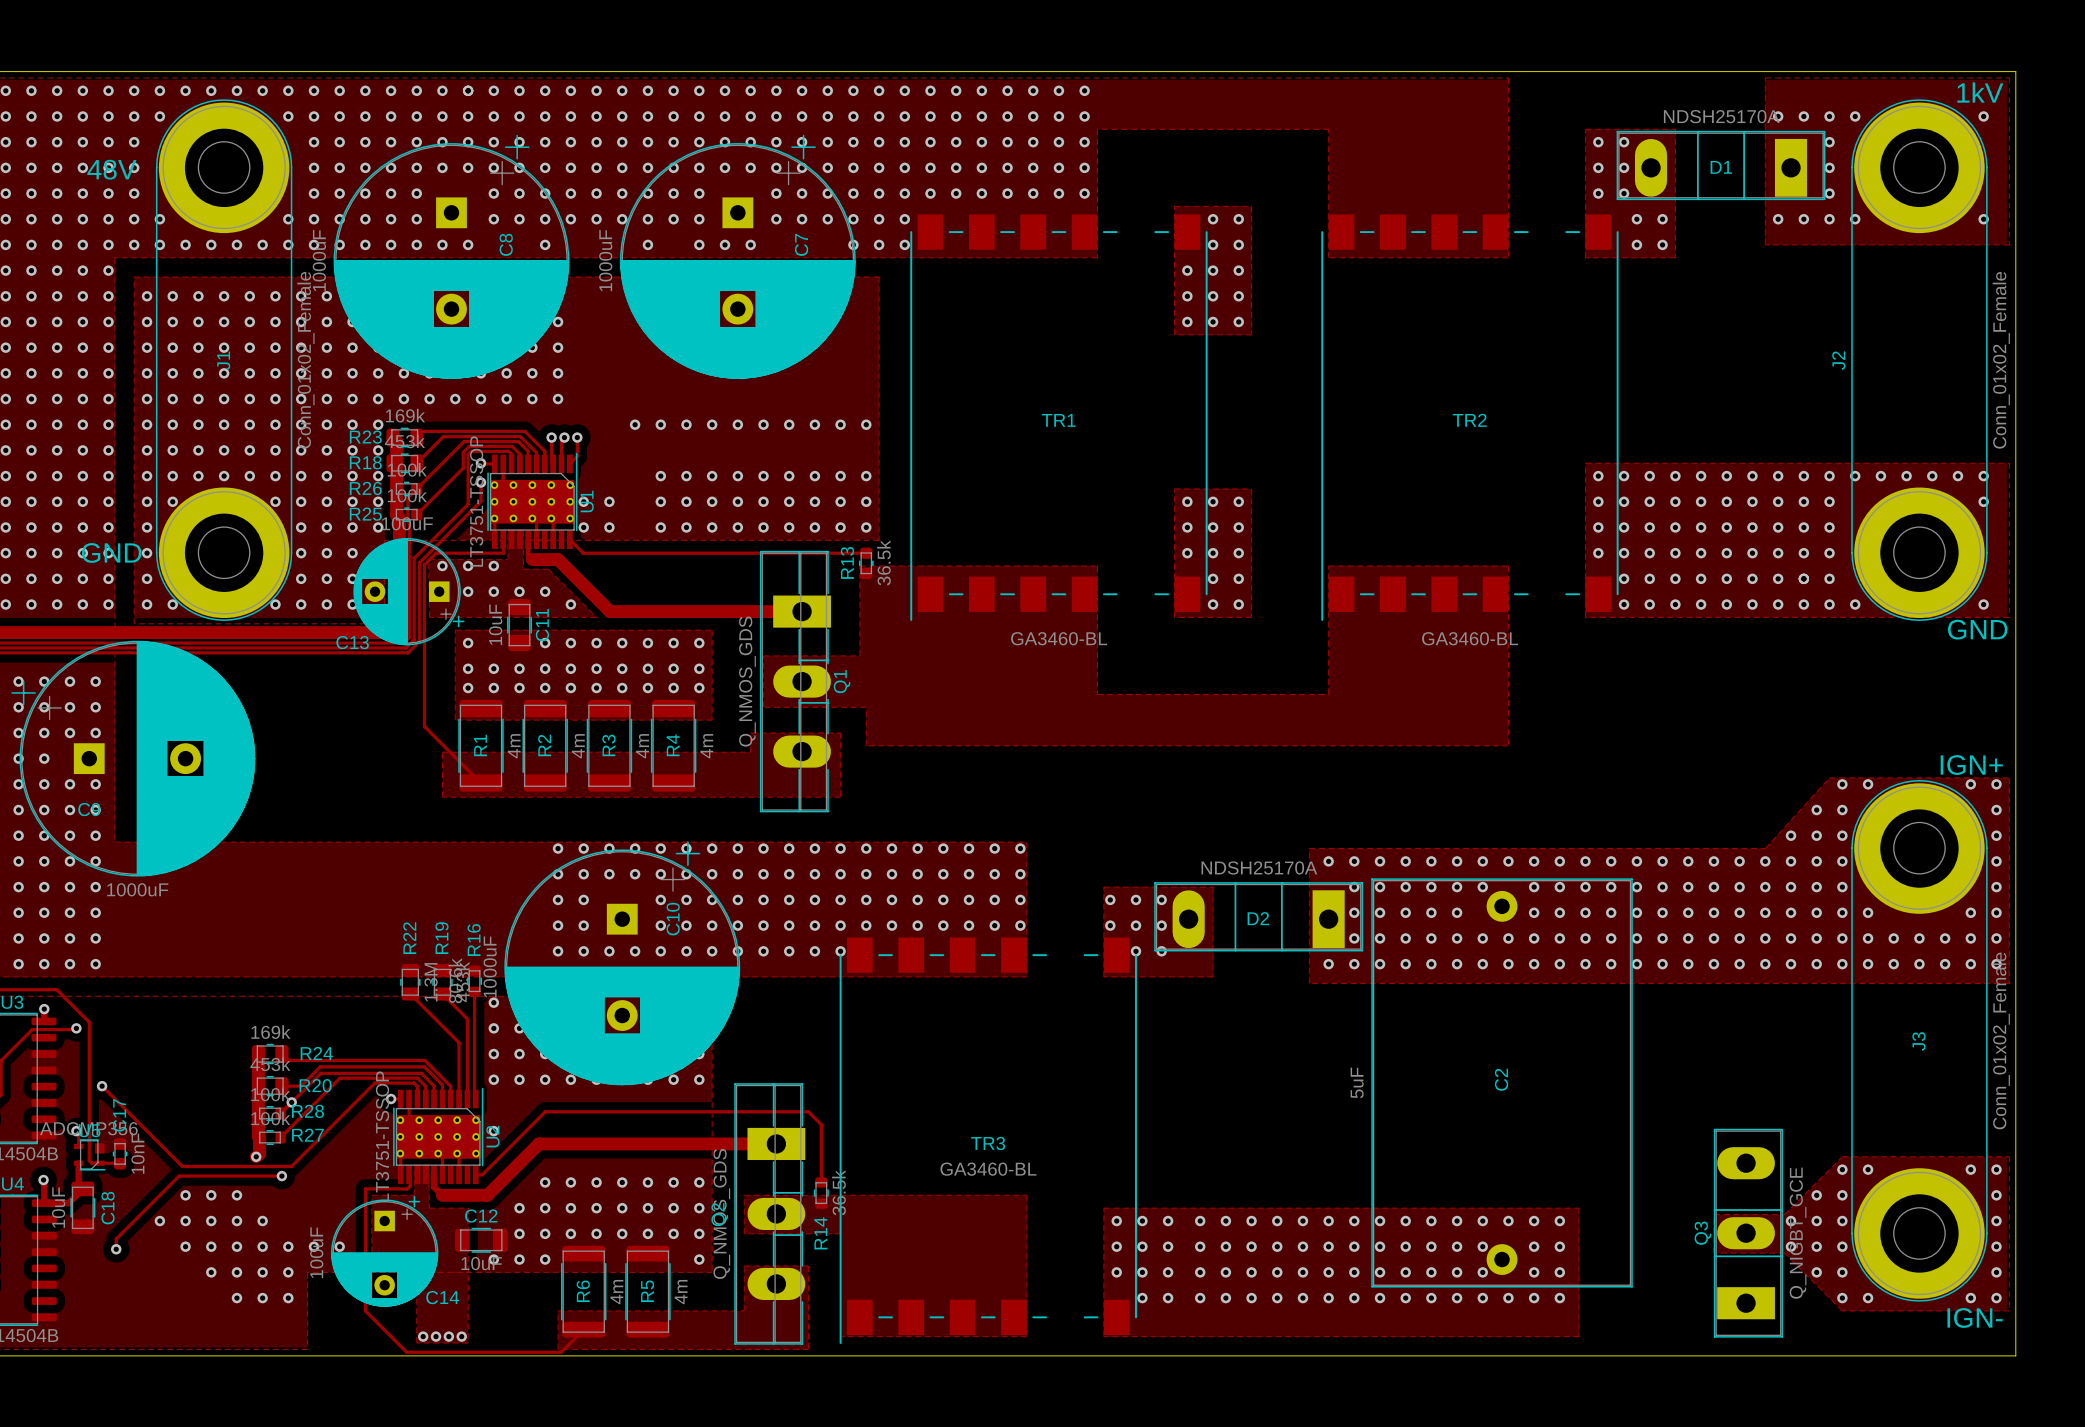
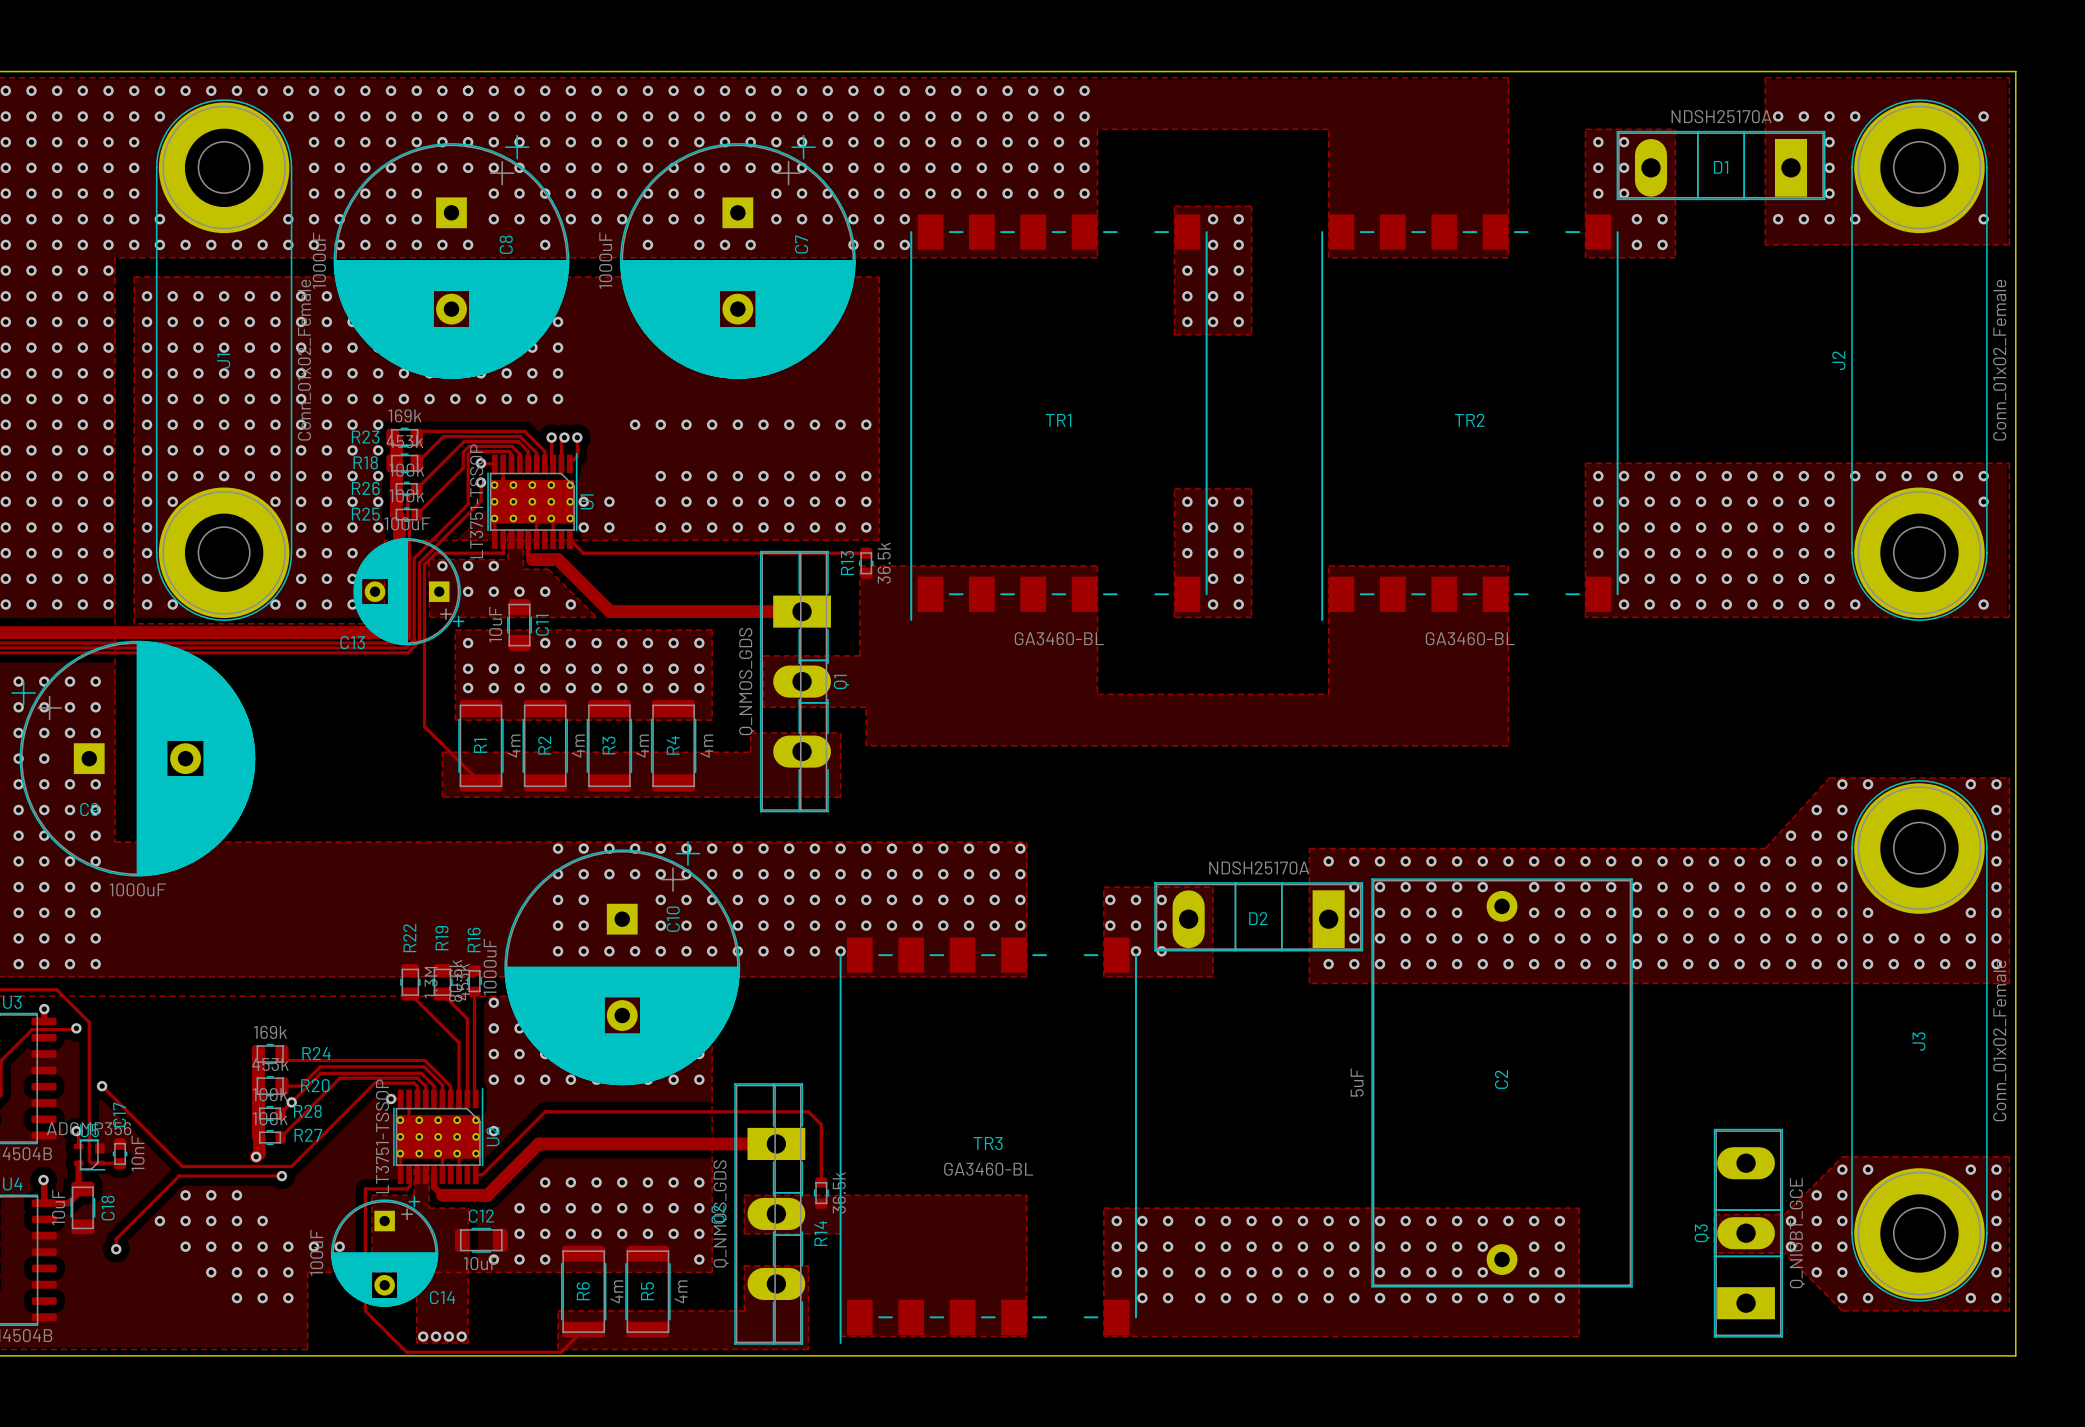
text: 1kV (1980, 92) -> none
text: 48V (111, 169) -> none
text: GND (111, 552) -> none
text: GND (1977, 629) -> none
text: IGN+ (1971, 765) -> none
text: IGN- (1975, 1317) -> none

